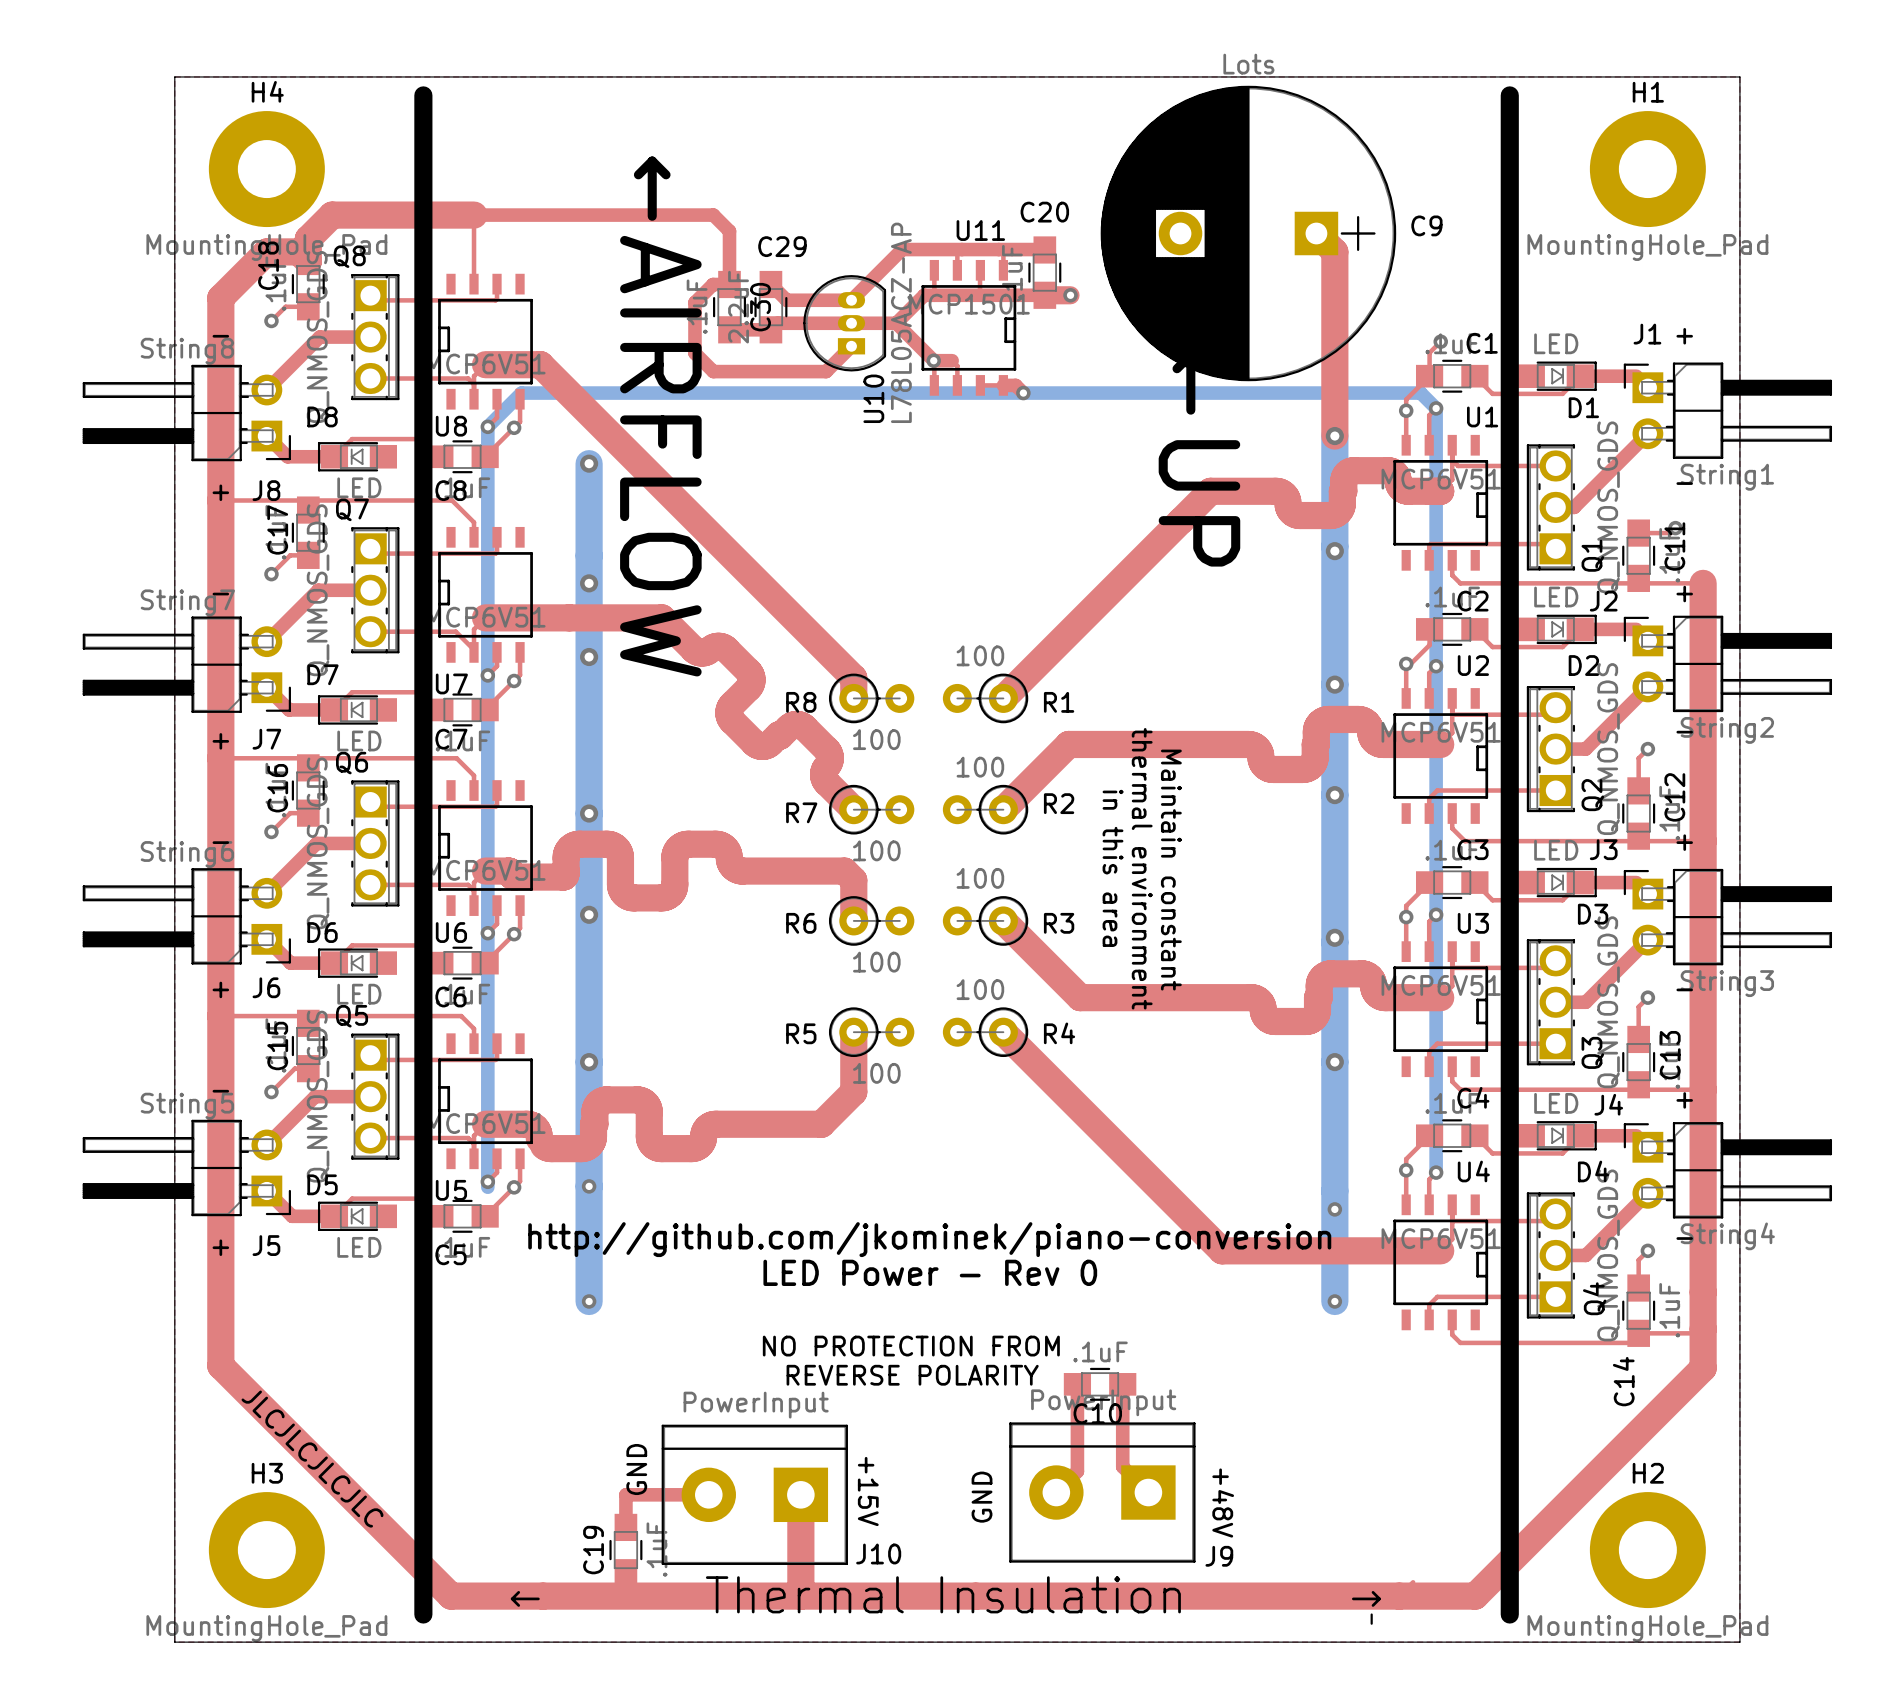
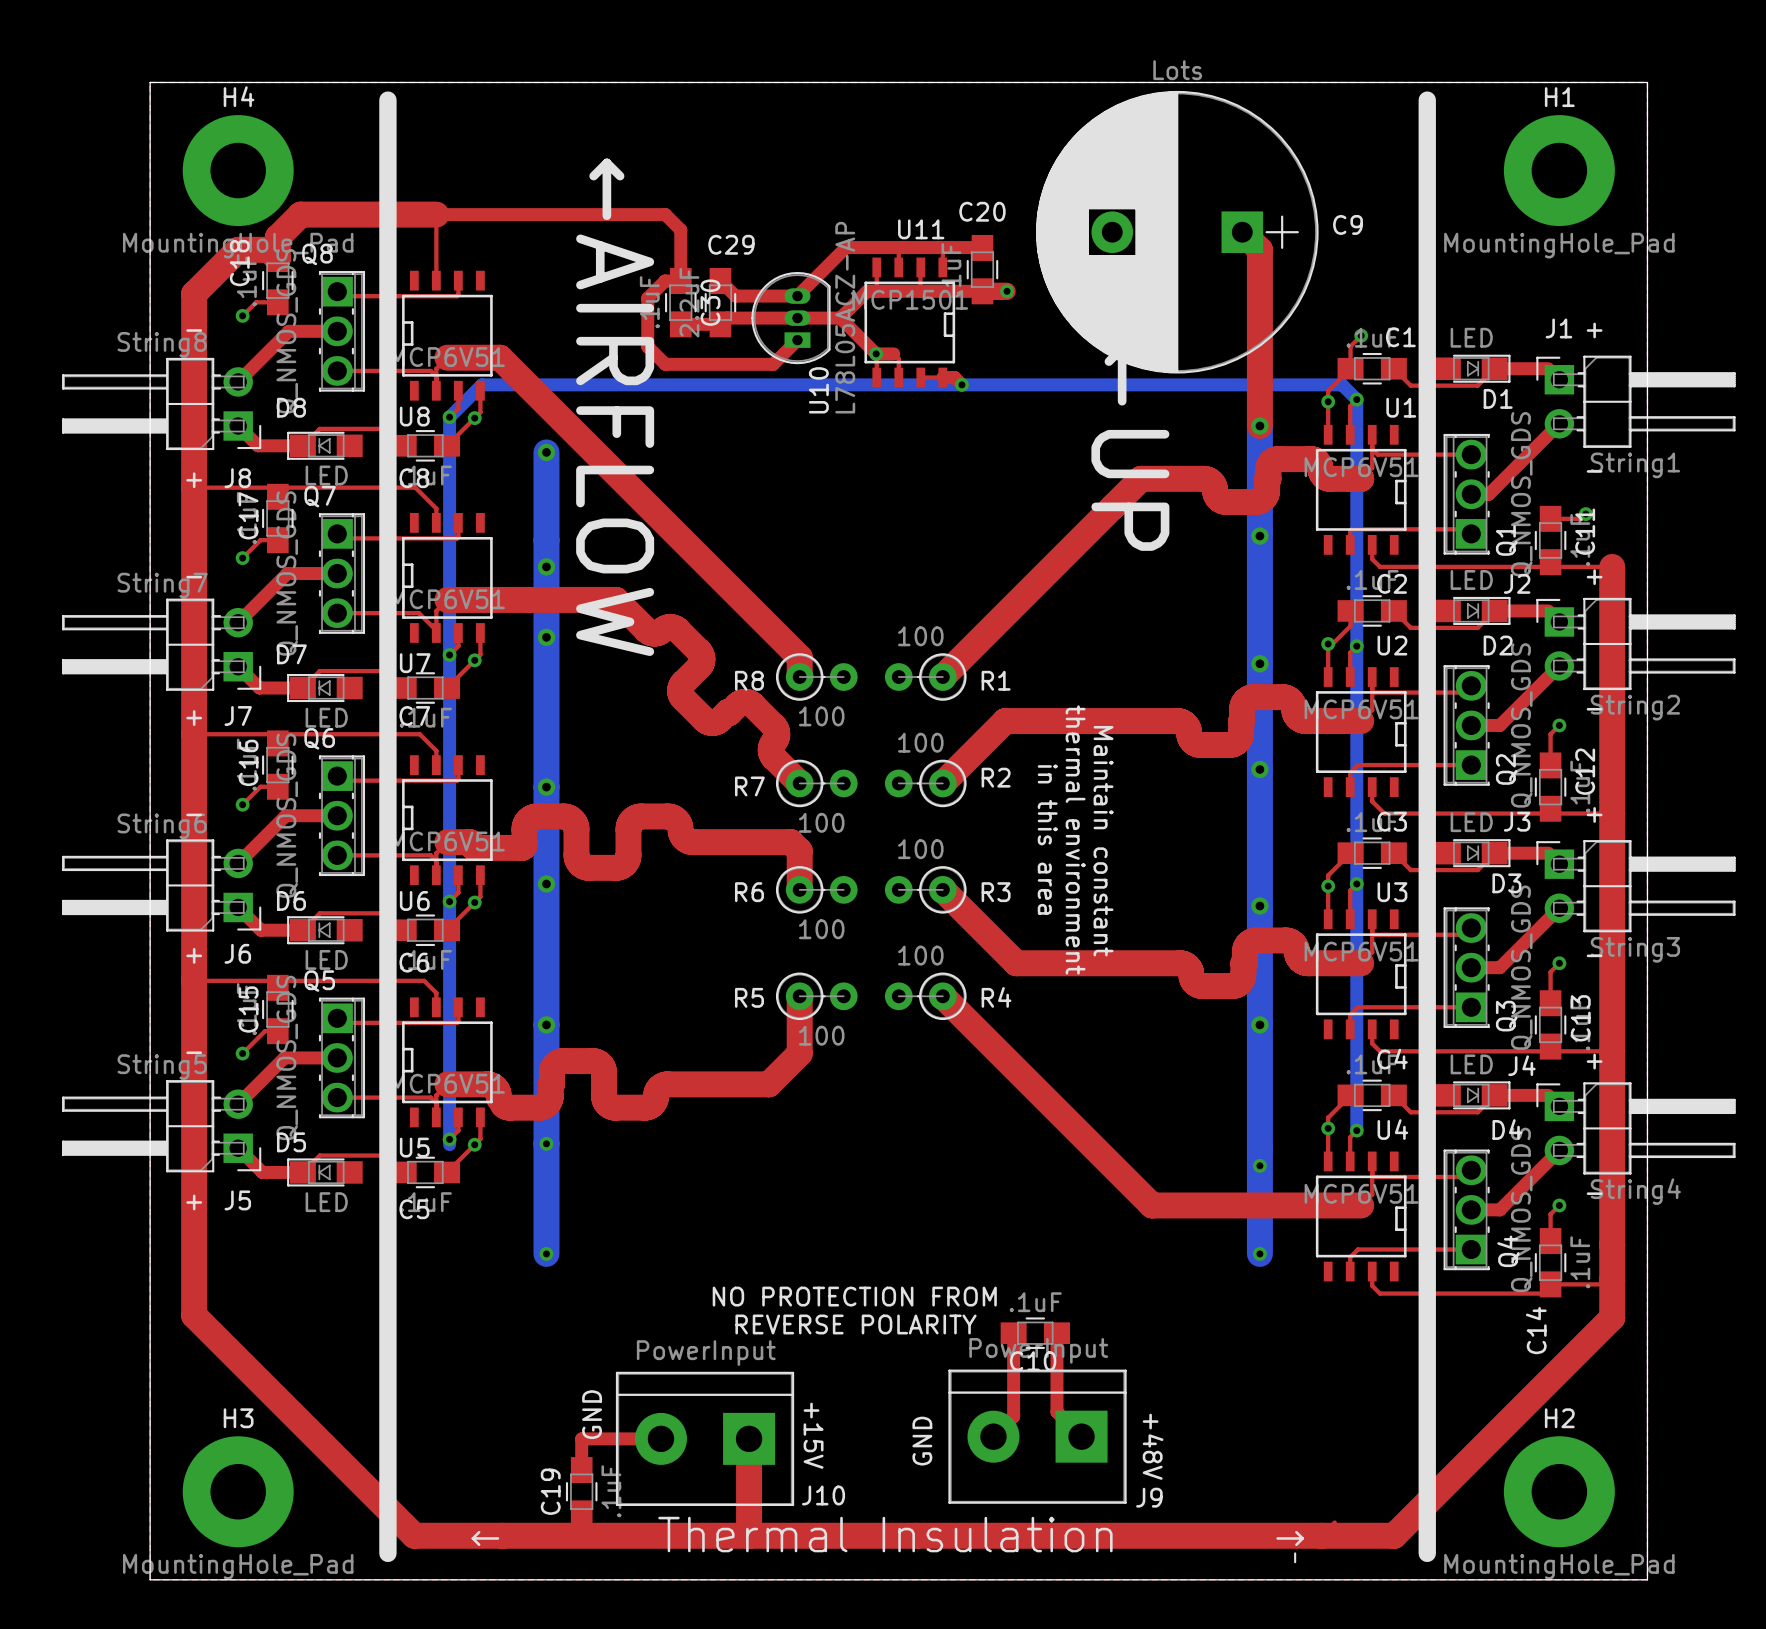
text: http://github.com/jkominek/piano-conversion (929, 1239) -> none
text: LED Power - Rev 0 (930, 1272) -> none
text: JLCJLCJLCJLC (312, 1459) -> none

